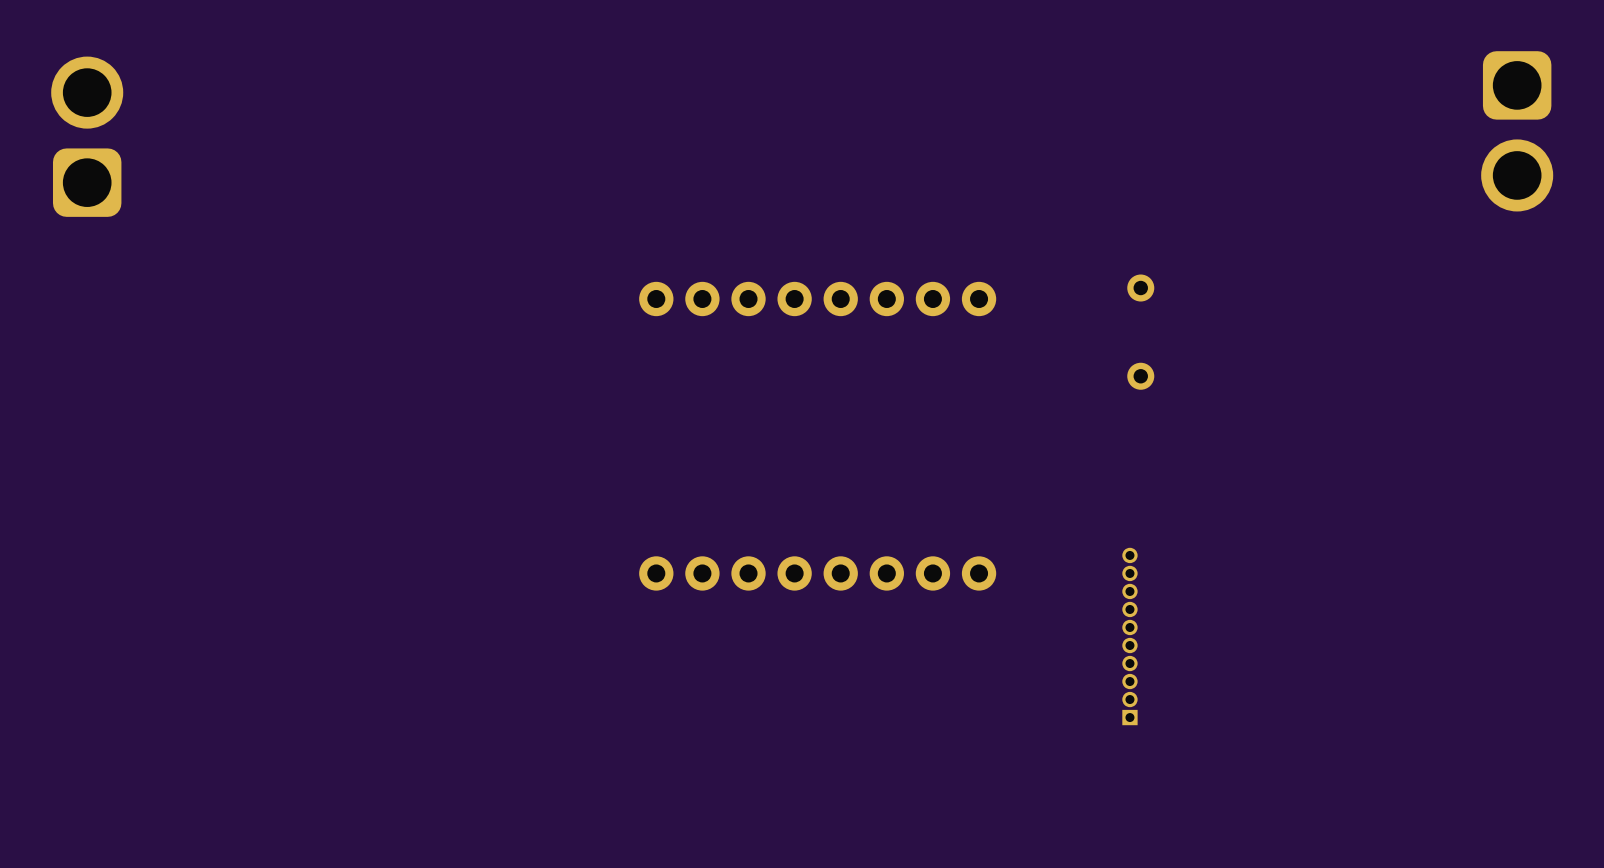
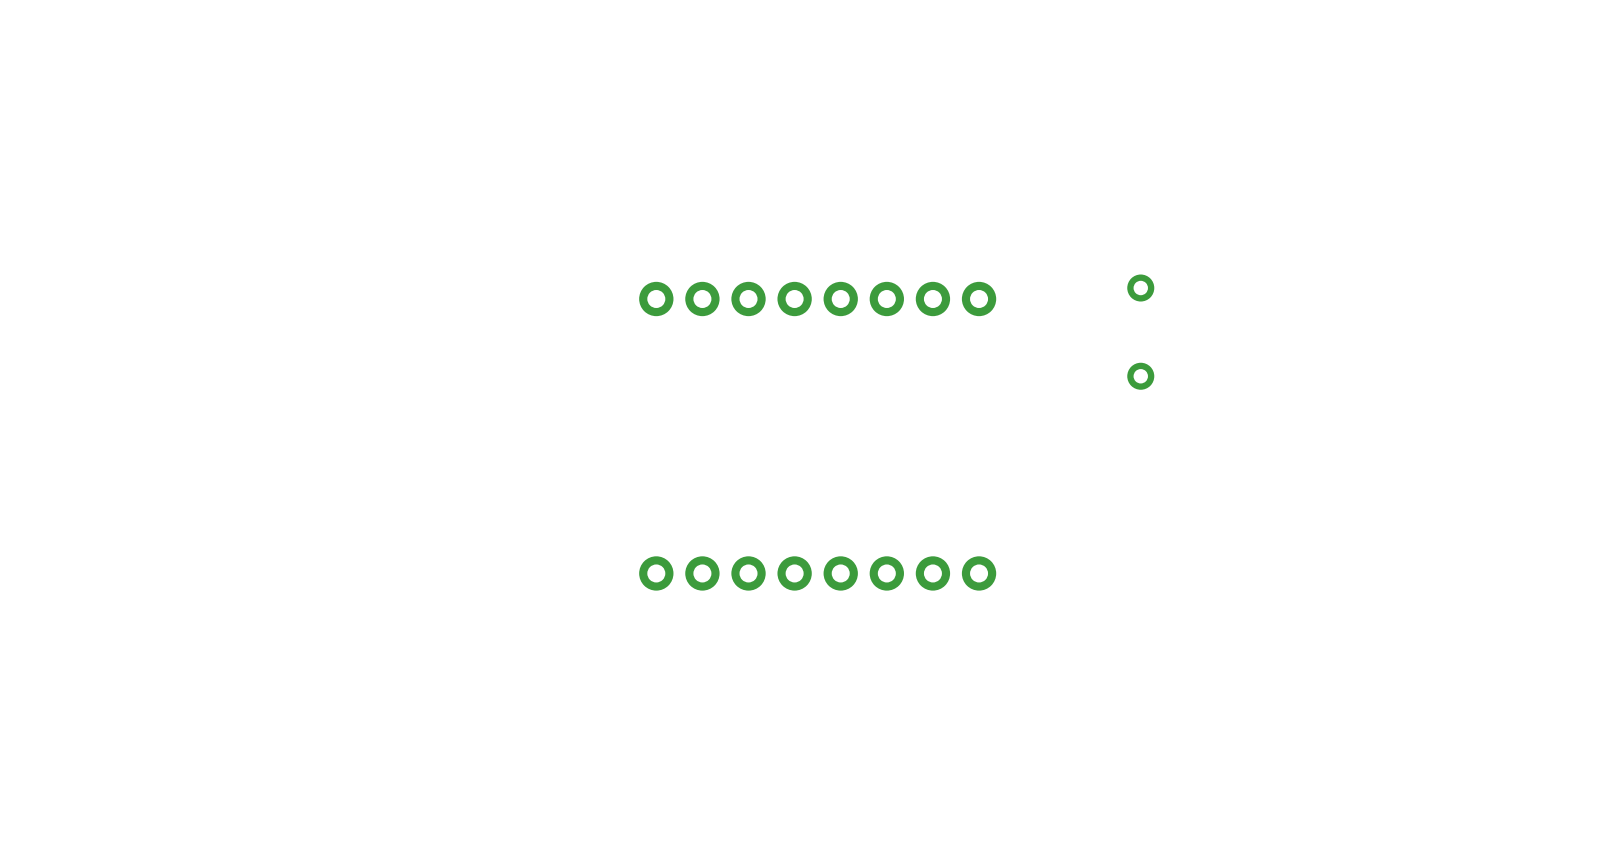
part: (1517, 131) -> none
part: (87, 136) -> none
part: (1129, 636) -> none

